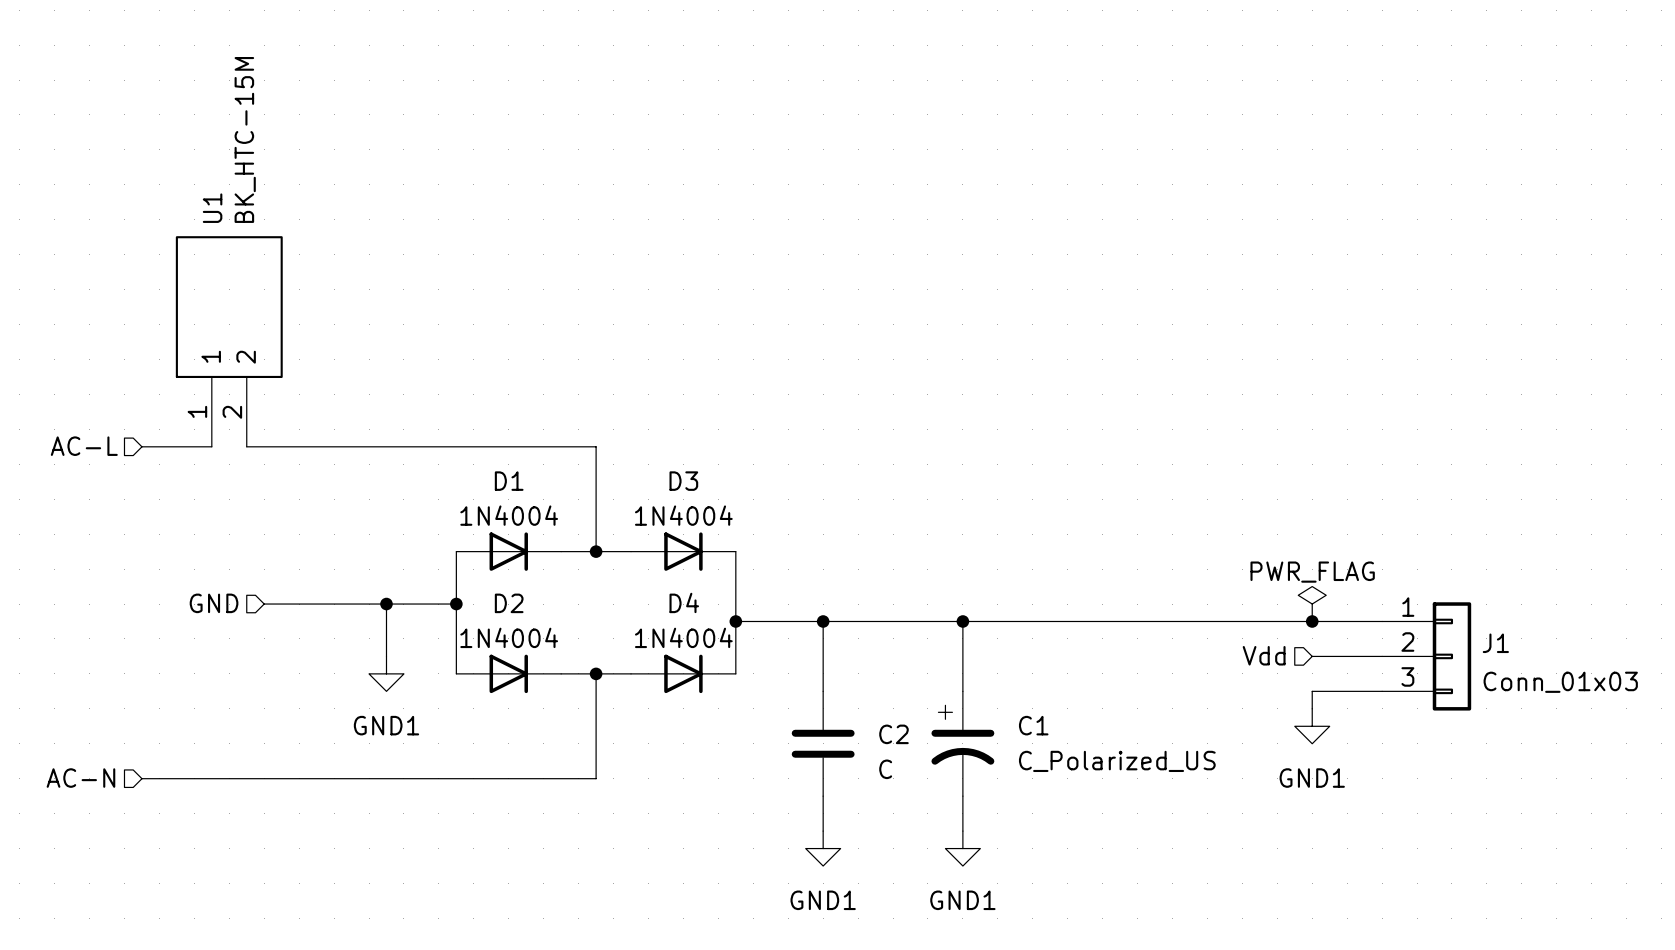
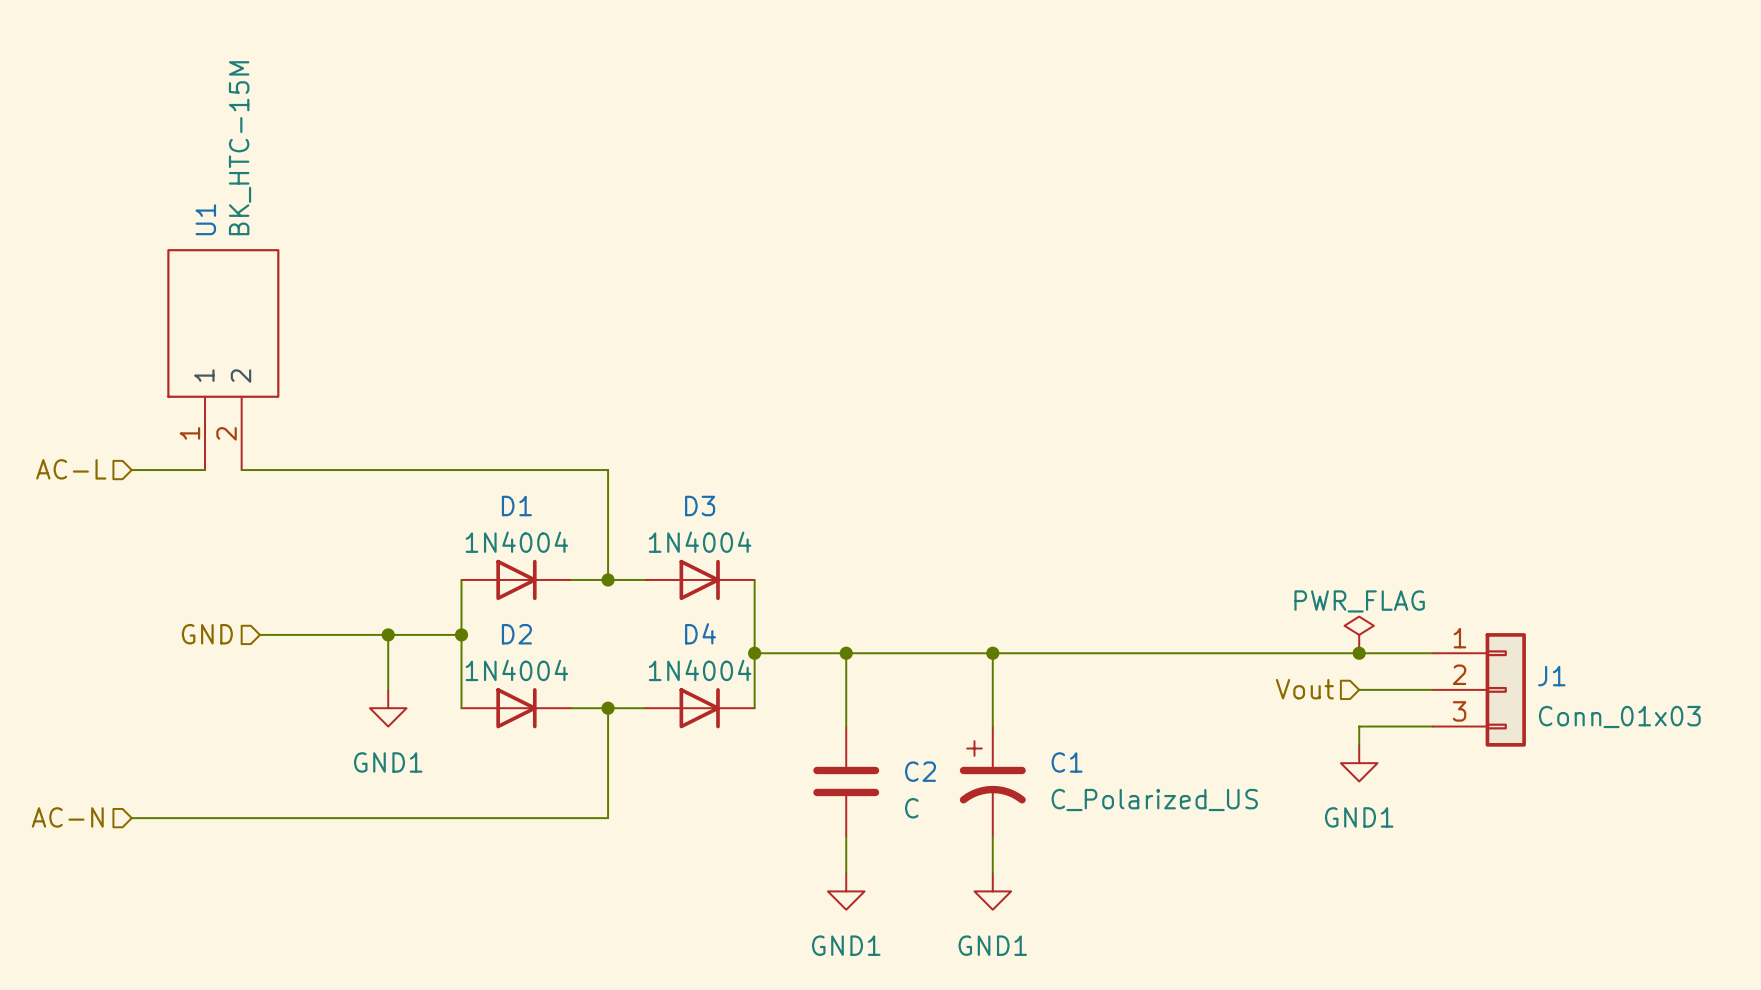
hierarchical label: Vdd (1264, 655) -> Vout (1304, 689)

